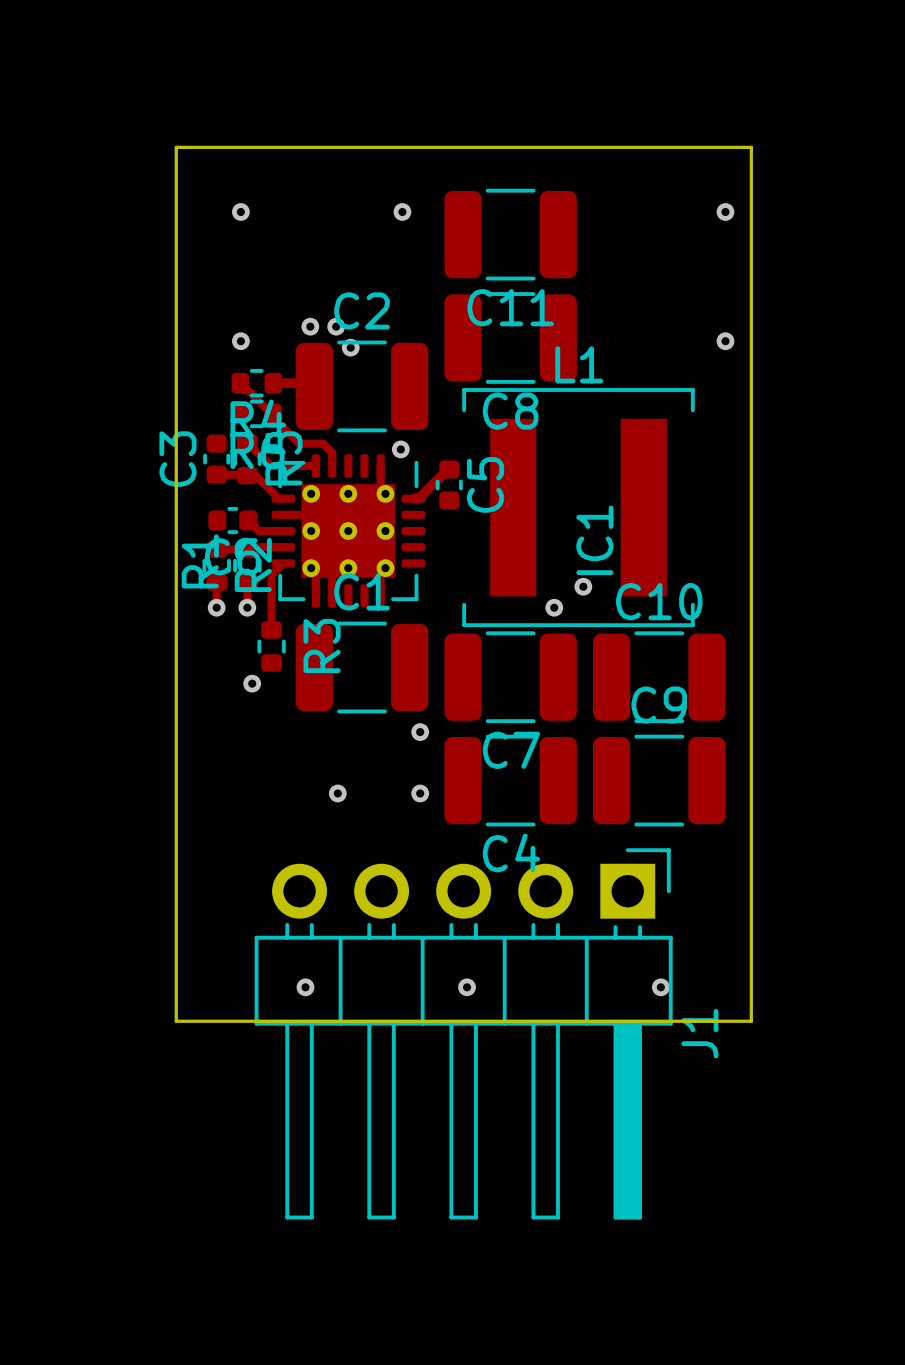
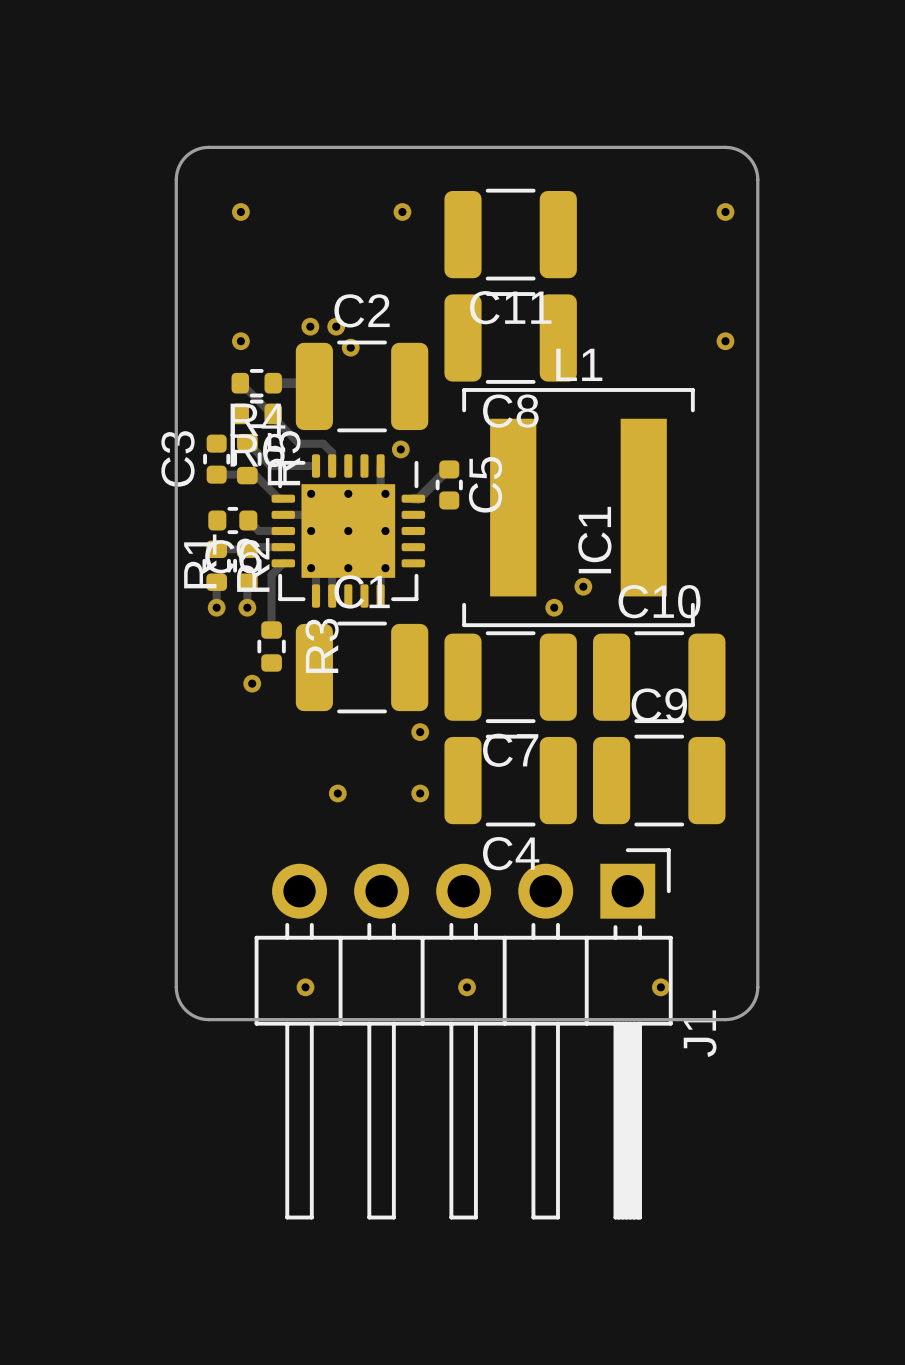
board edge: (208, 147) (176, 147) (176, 179) -> (208, 147) (194, 150) (185, 156) (178, 169) (176, 179)
board edge: (725, 147) (751, 147) (751, 1021) (176, 1021) (176, 987) -> (725, 147) (736, 149) (748, 156) (754, 165) (757, 179) (757, 987) (752, 1004) (739, 1016) (725, 1019) (208, 1019) (197, 1017) (185, 1010) (179, 1001) (176, 987)

